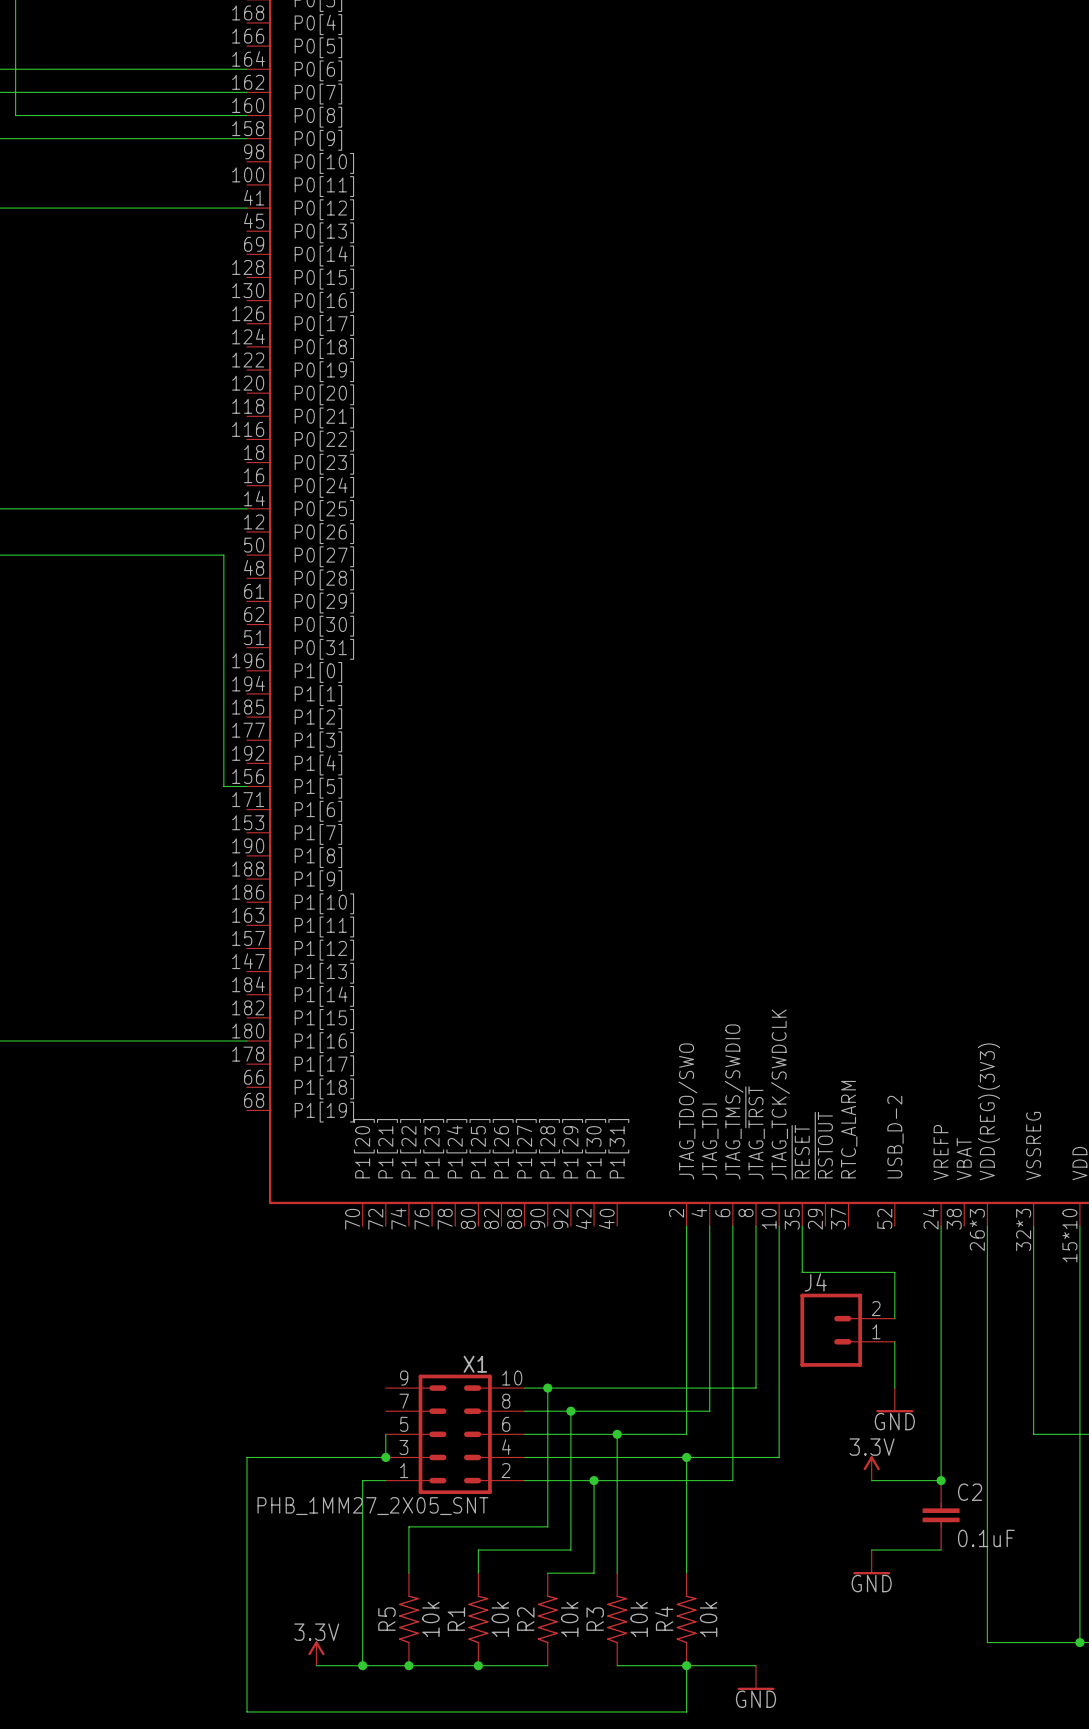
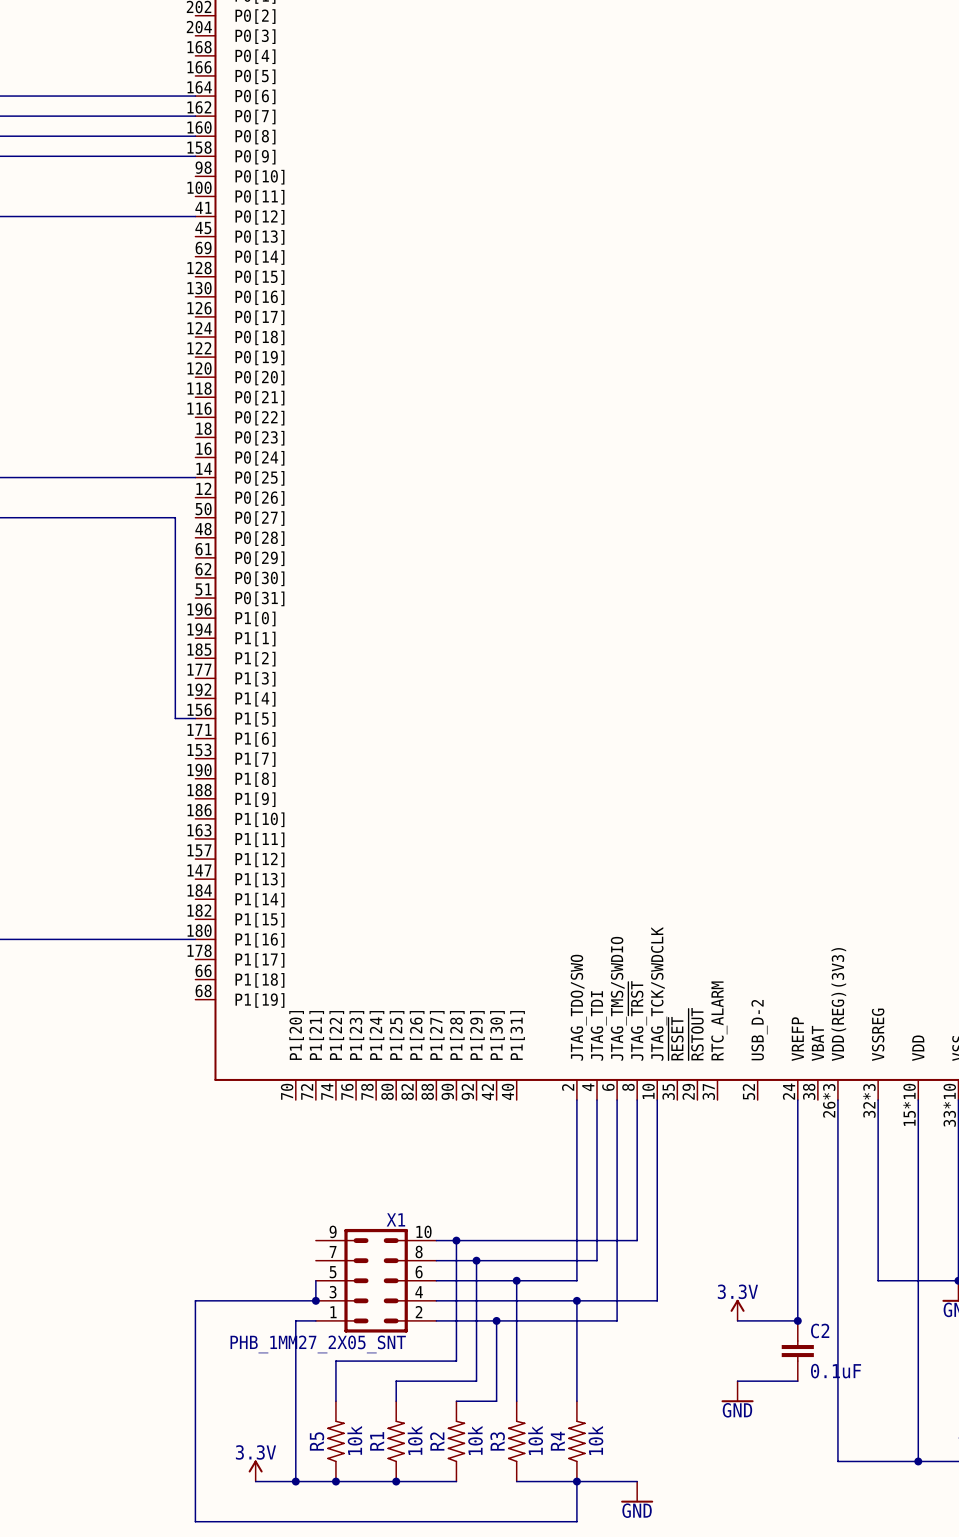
wire: (802, 1226) (802, 1272) (894, 1272) (894, 1318) -> none
J4: (847, 1330) -> none
wire: (894, 1341) (894, 1388) -> none
power symbol: GND (894, 1400) -> none

